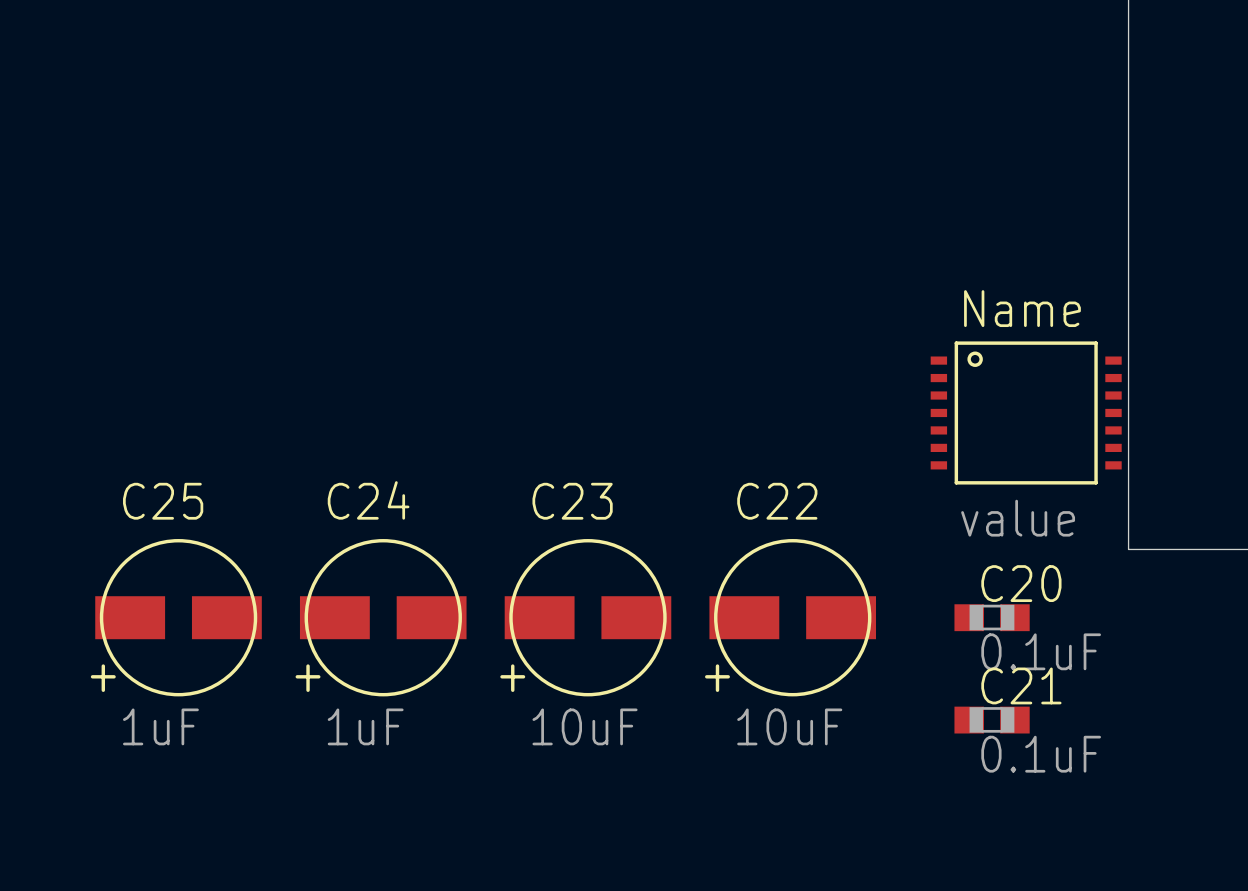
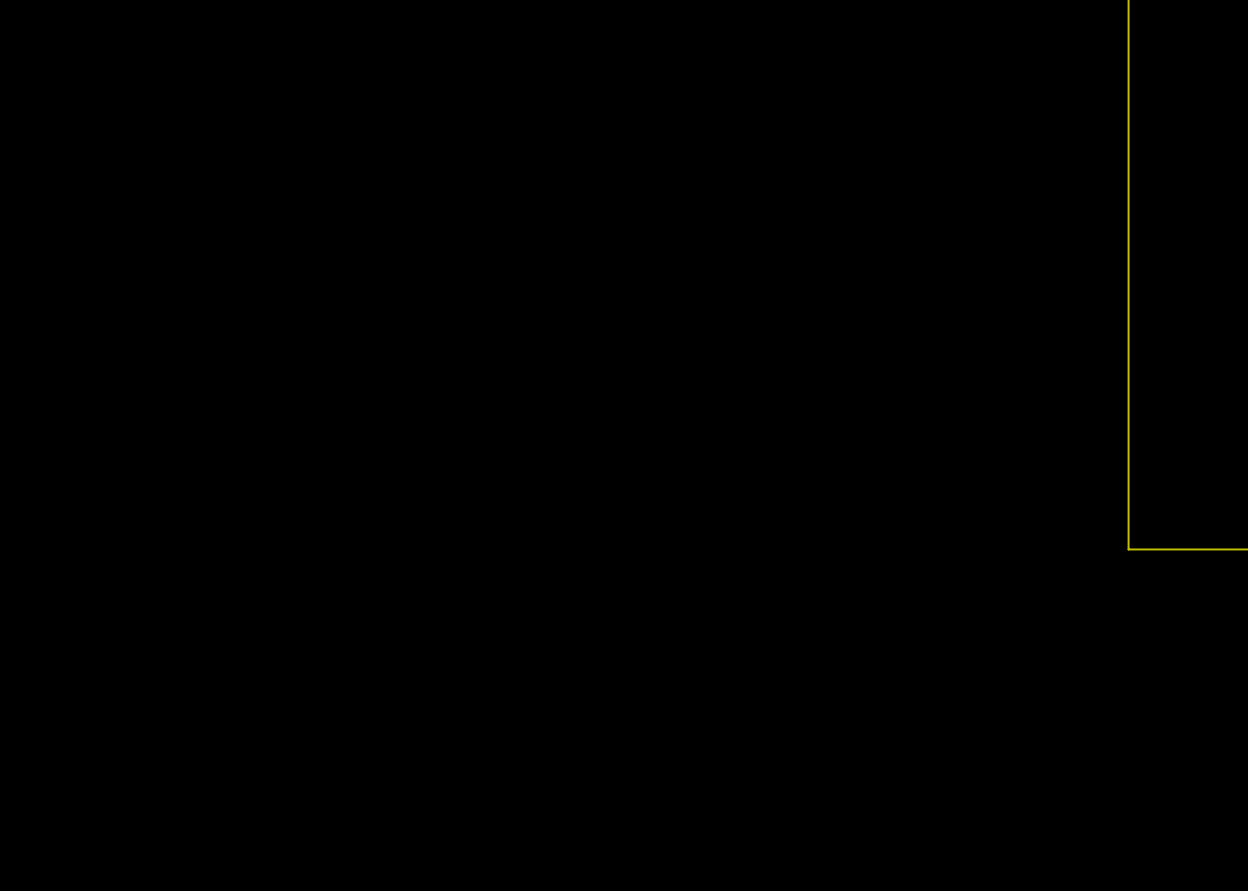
part: (1026, 412) -> none
C25: 1uF (176, 617) -> none
C24: 1uF (381, 617) -> none
C23: 10uF (585, 617) -> none
C22: 10uF (790, 617) -> none
C20: 0.1uF (992, 617) -> none
C21: 0.1uF (992, 720) -> none

